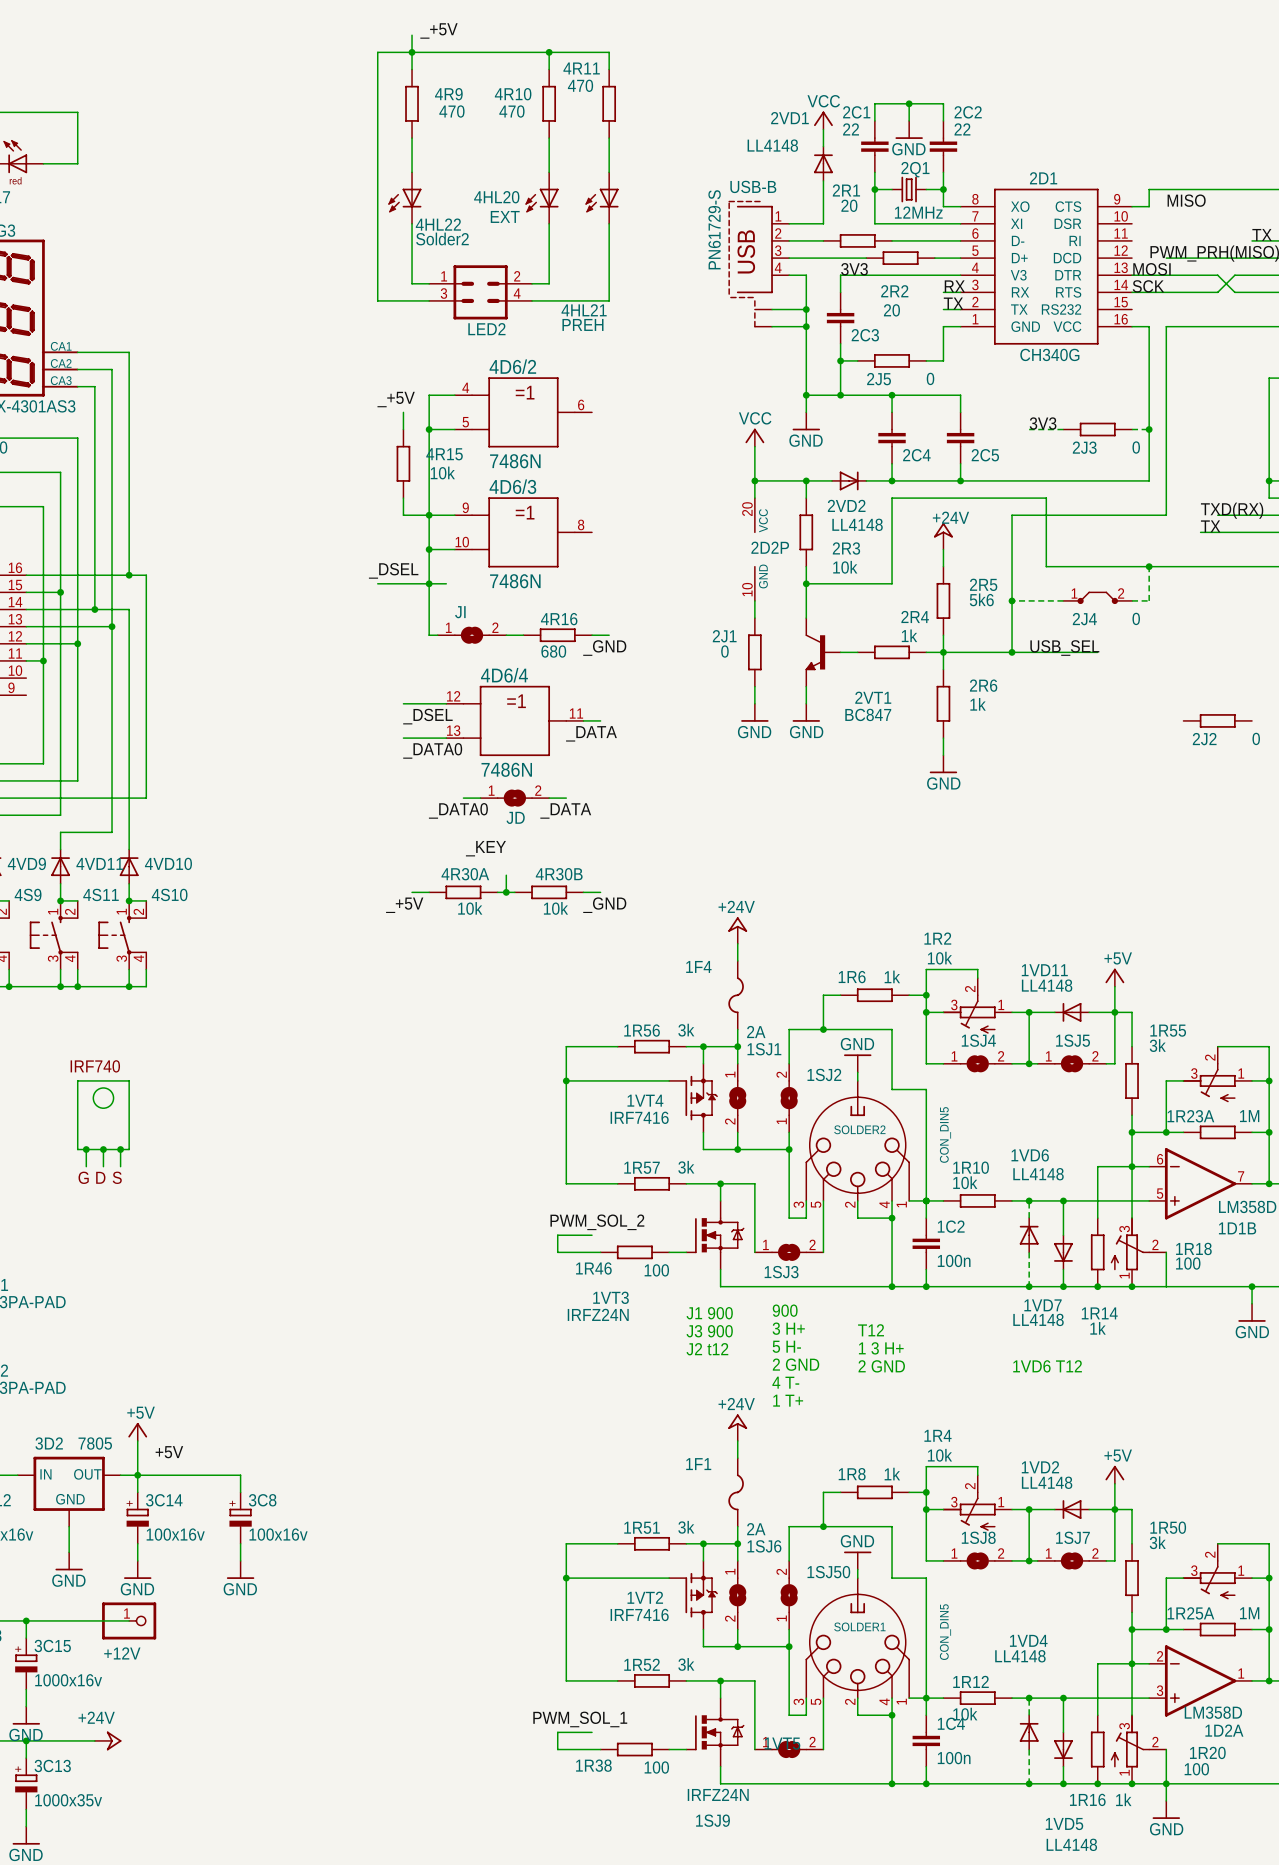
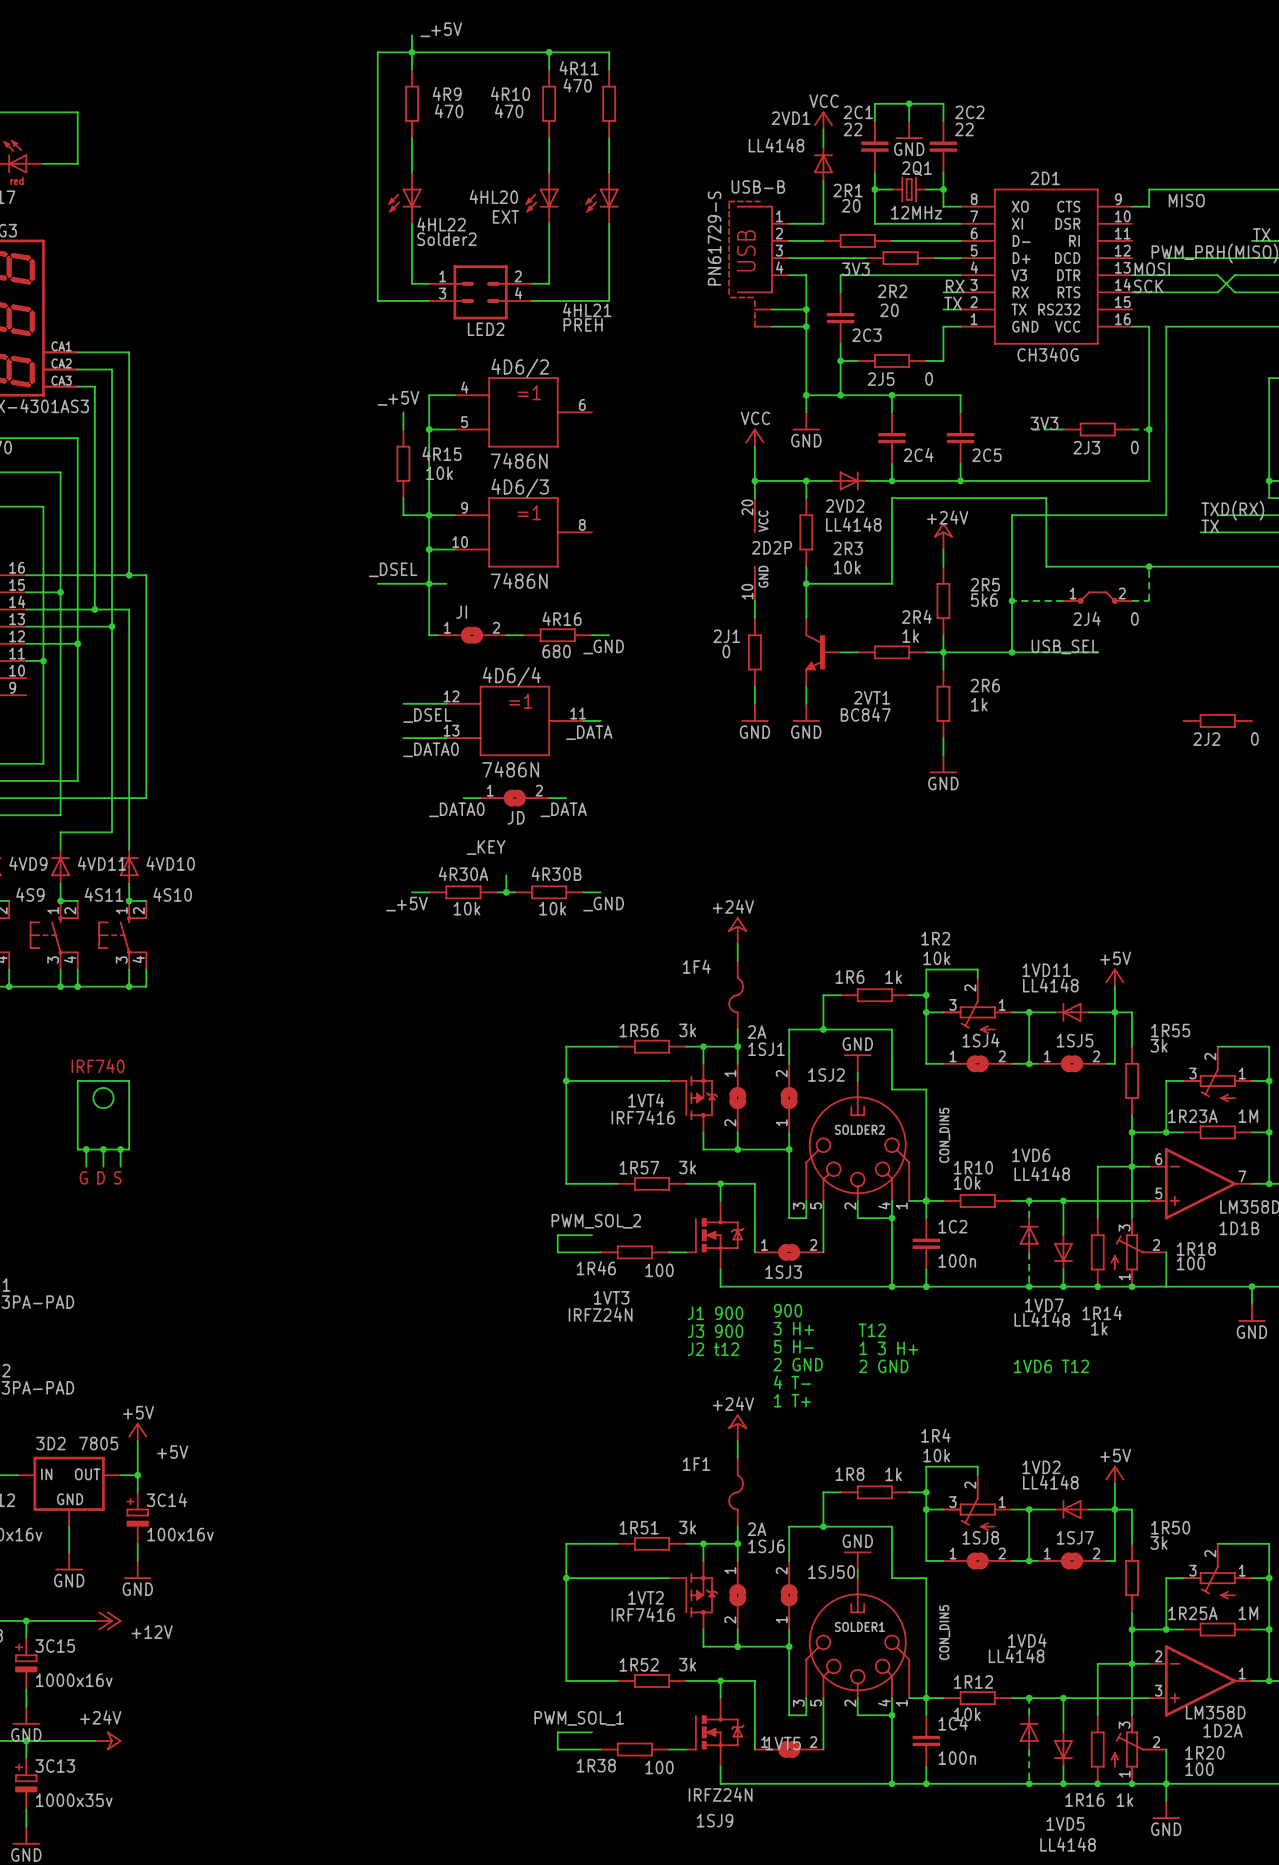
wire: (137, 1475) (240, 1475) (240, 1492) -> none
3C8: 100x16v (240, 1518) -> none
wire: (240, 1543) (240, 1560) -> none
power symbol: GND (240, 1569) -> none
power symbol: none -> +12V (108, 1620)
+12V: (129, 1620) -> none

